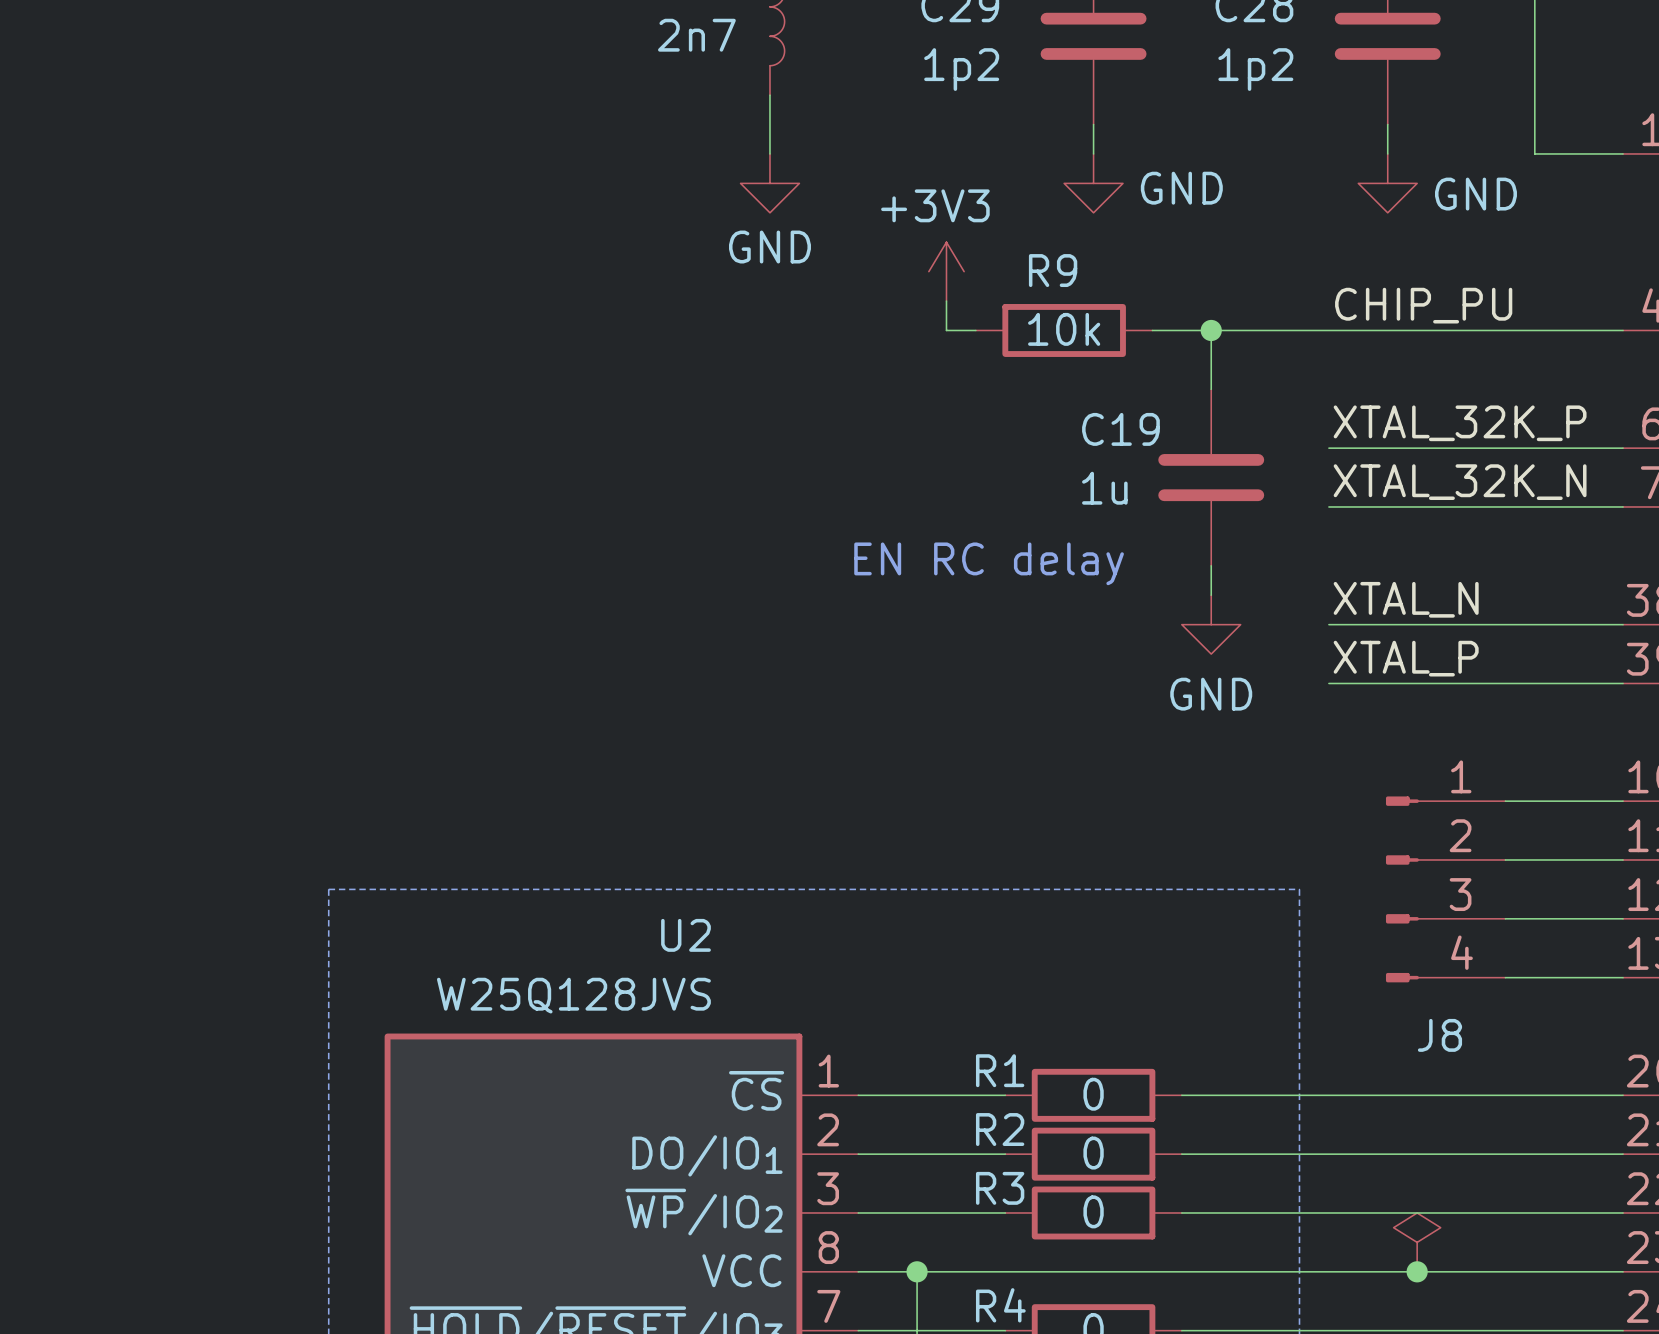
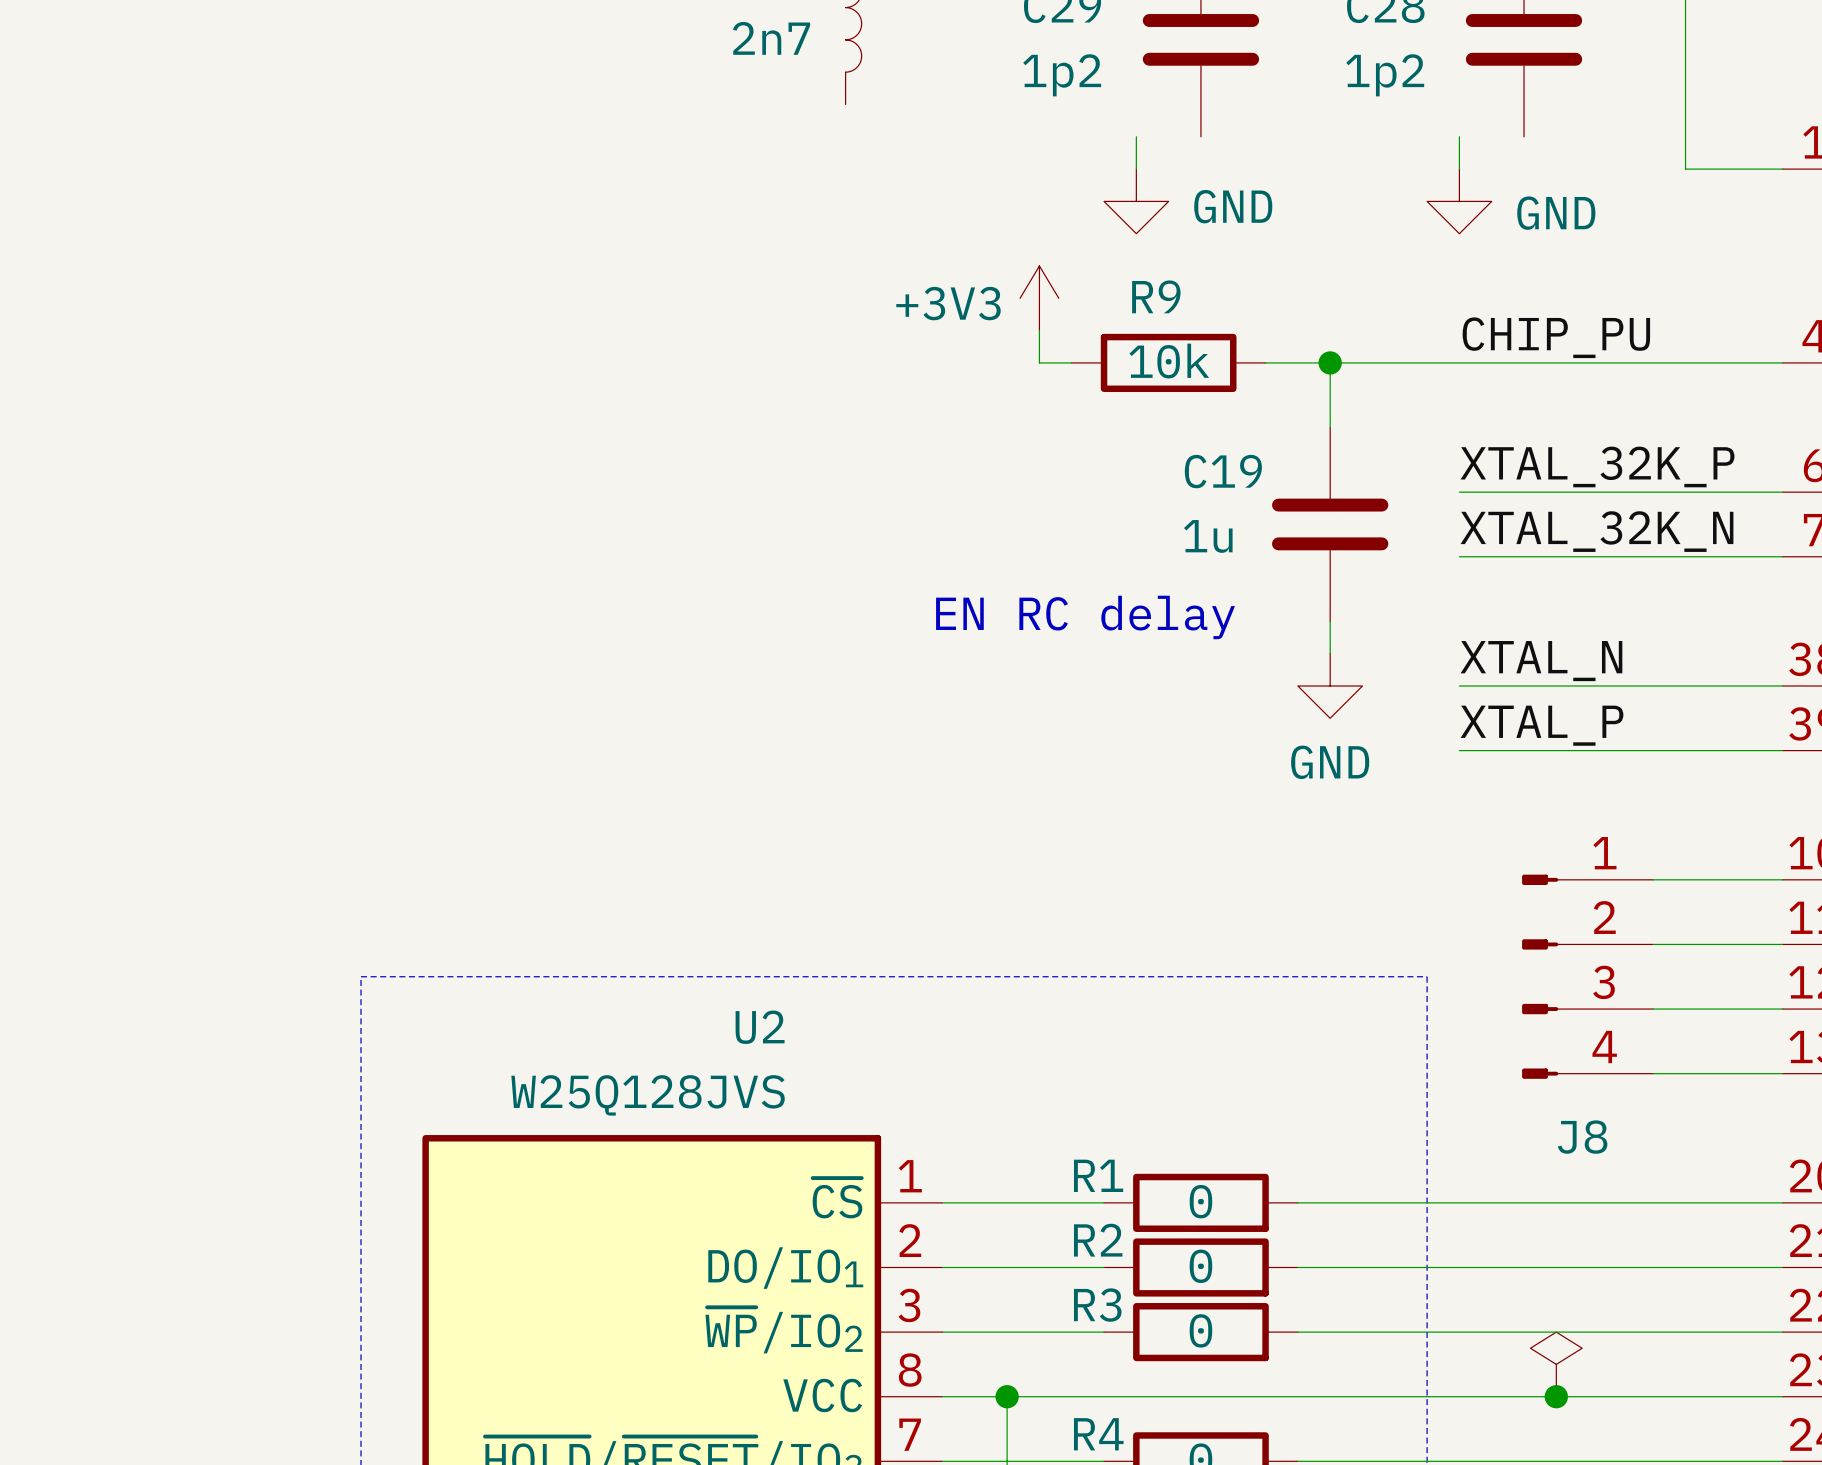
wire: (769, 95) (769, 153) -> none
wire: (1093, 124) (1093, 153) -> (1136, 136) (1136, 169)
wire: (1387, 124) (1387, 153) -> (1459, 136) (1459, 169)
power symbol: GND (769, 183) -> none
power symbol position: GND (1093, 183) -> GND (1136, 201)
power symbol position: GND (1387, 183) -> GND (1459, 201)
power symbol text position: +3V3 (935, 205) -> +3V3 (948, 303)

